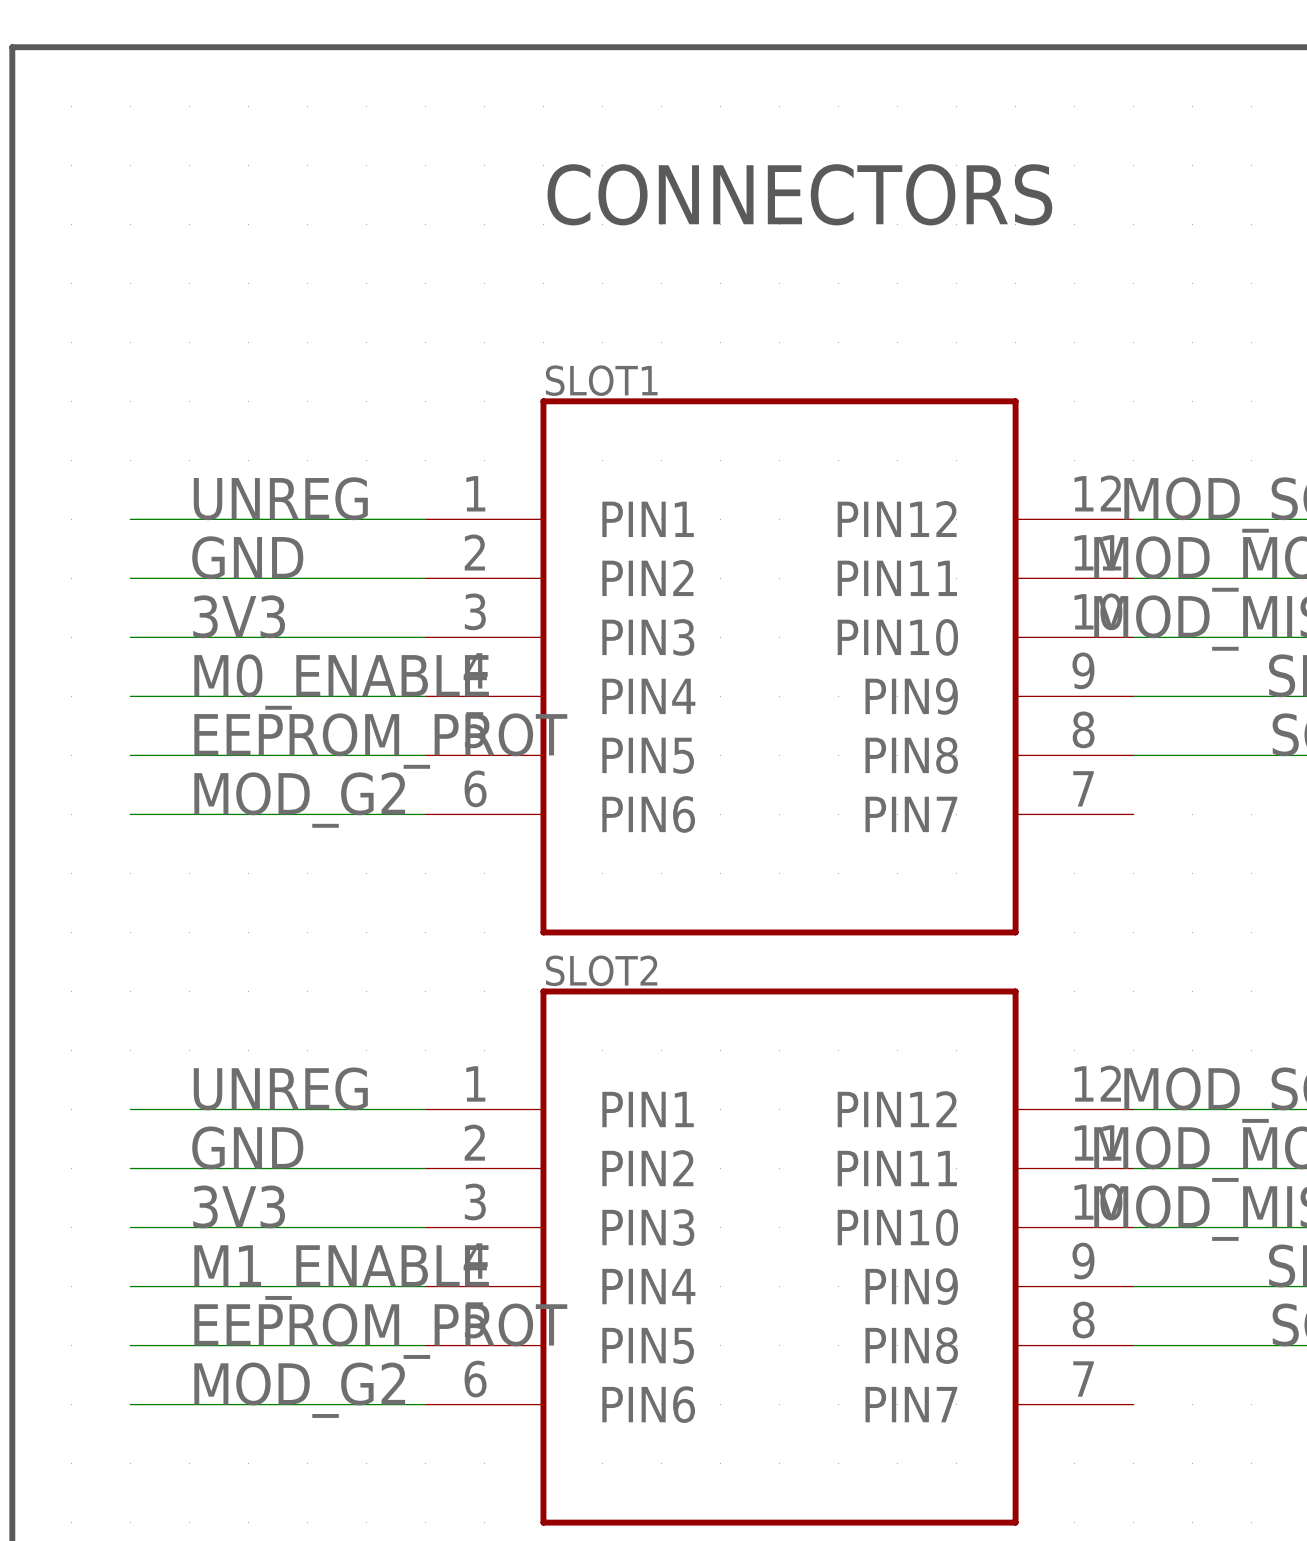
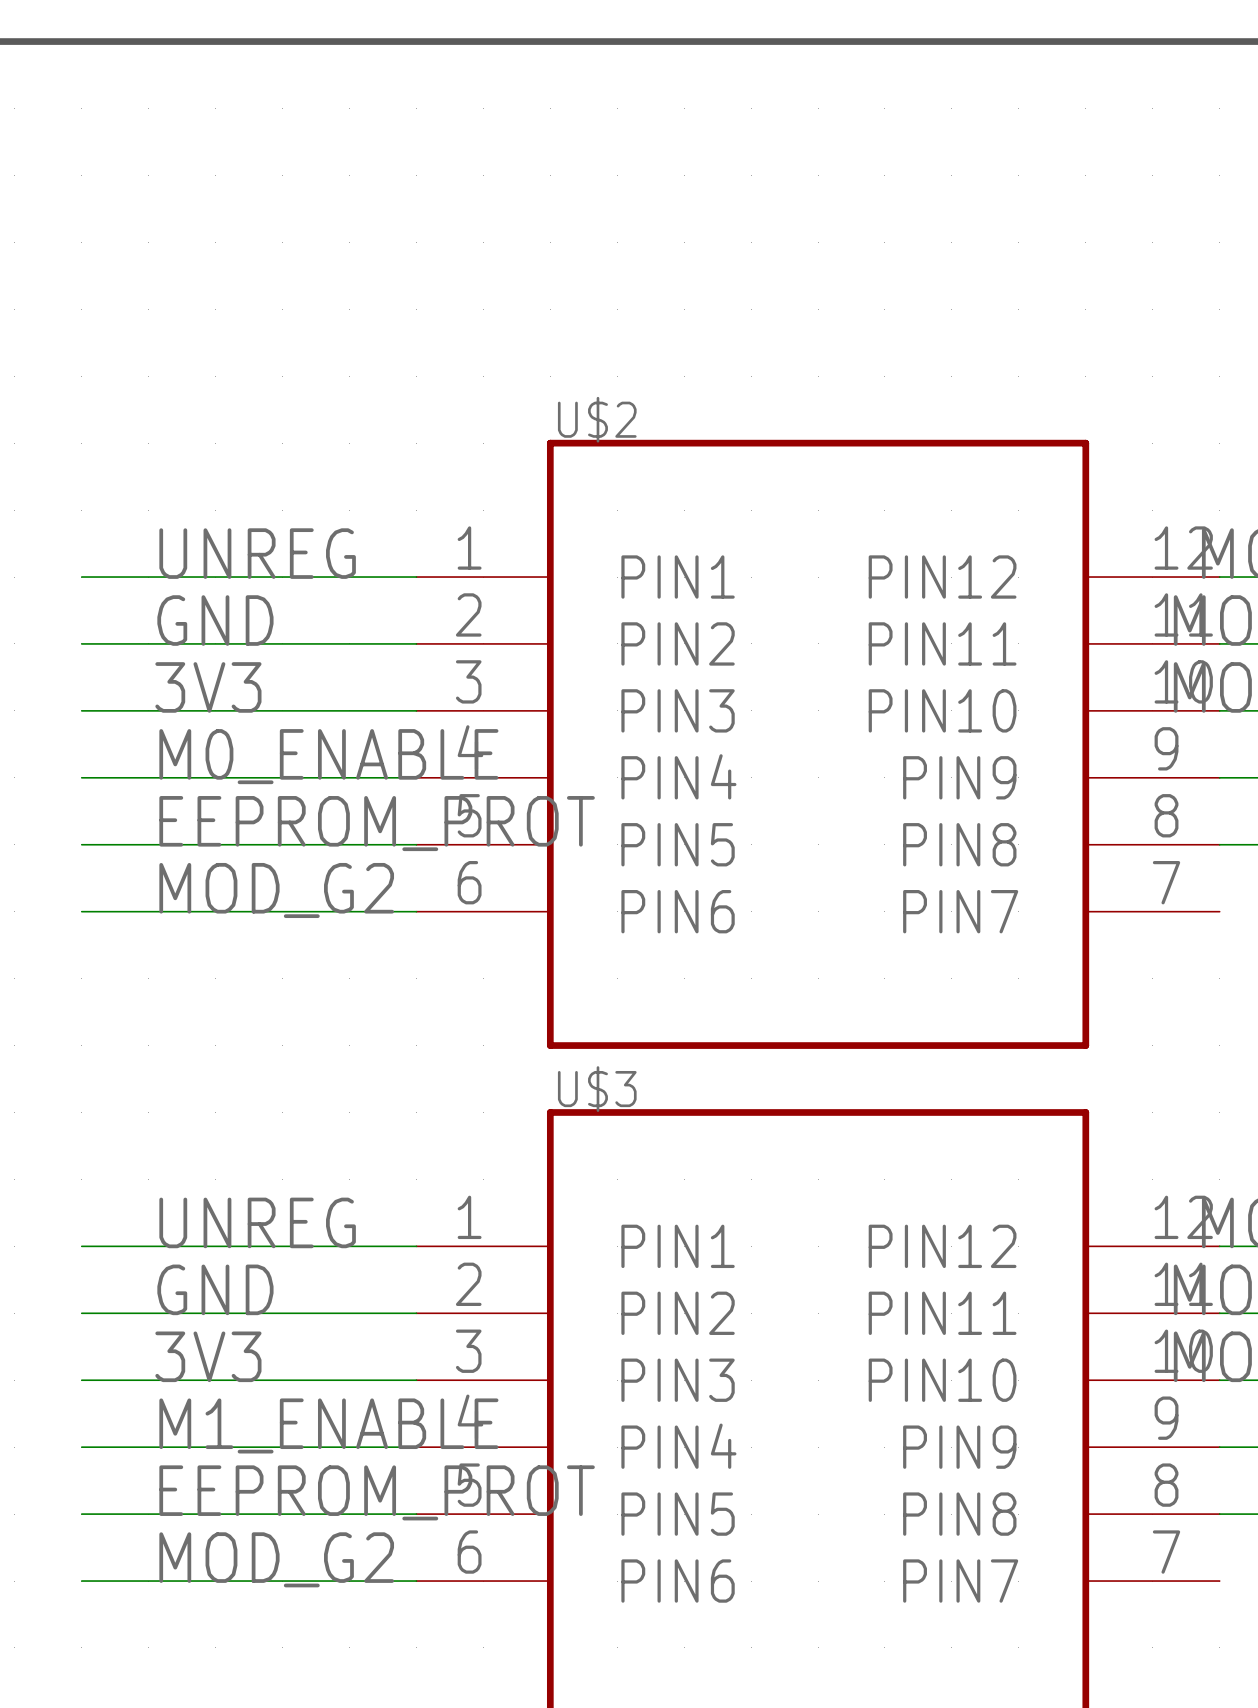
text: CONNECTORS (799, 194) -> none
SLOT1 name: SLOT1 (601, 380) -> U$2 (597, 419)
SLOT2 name: SLOT2 (601, 970) -> U$3 (597, 1089)

